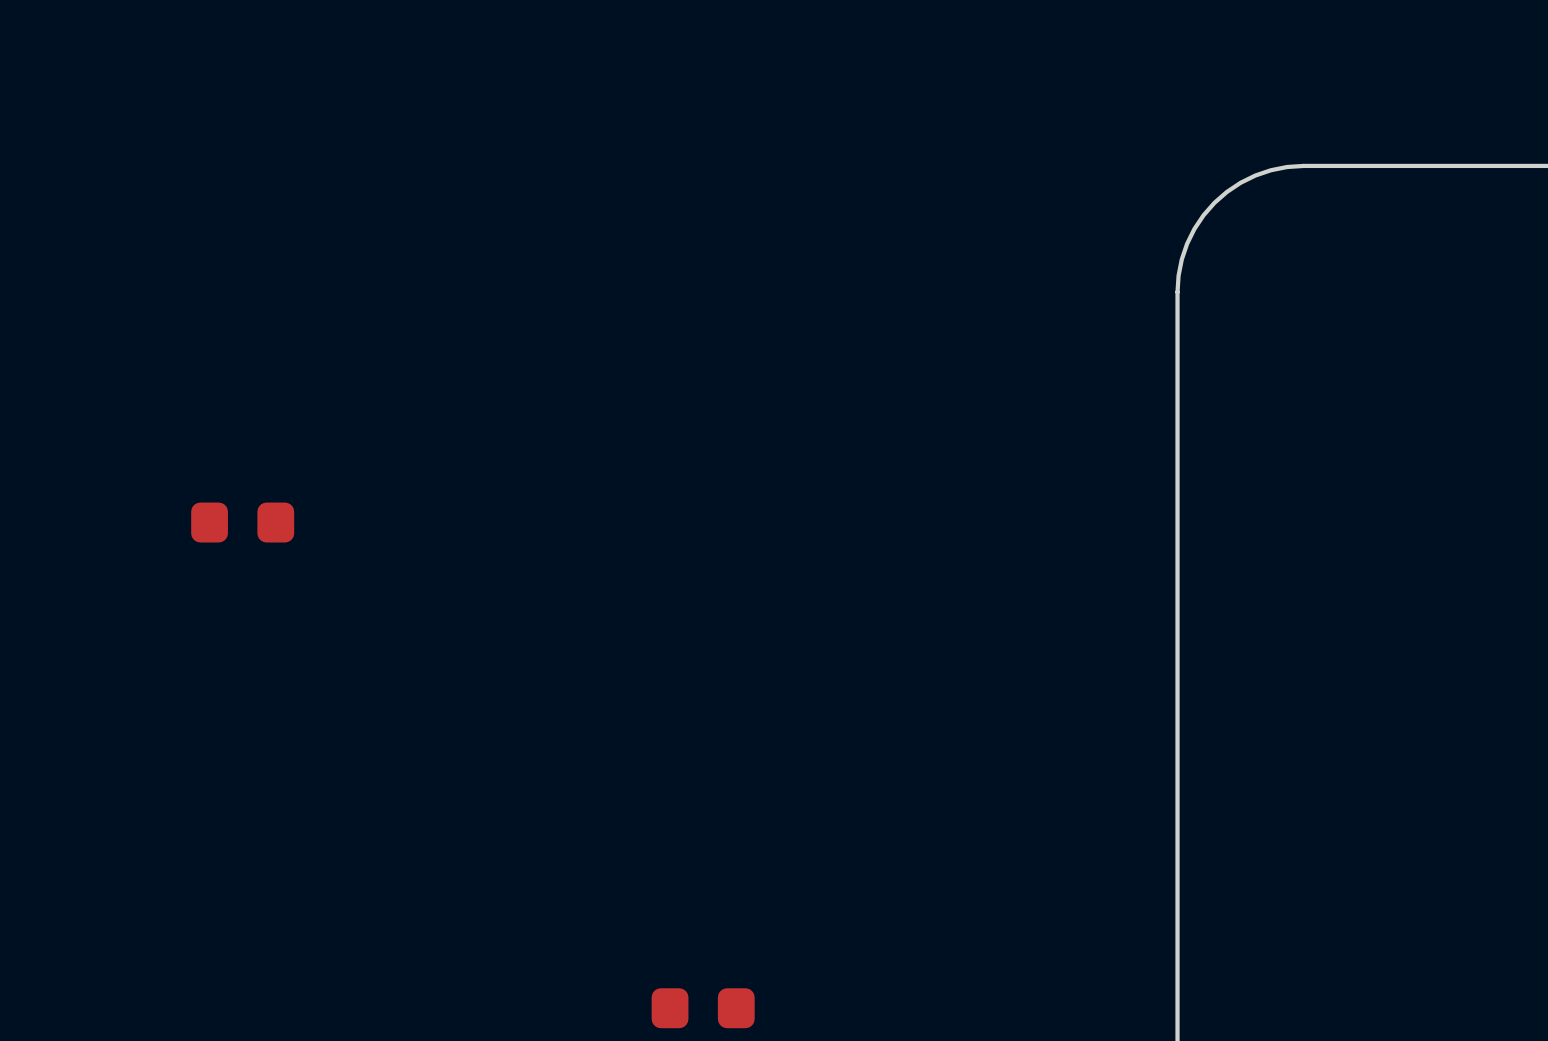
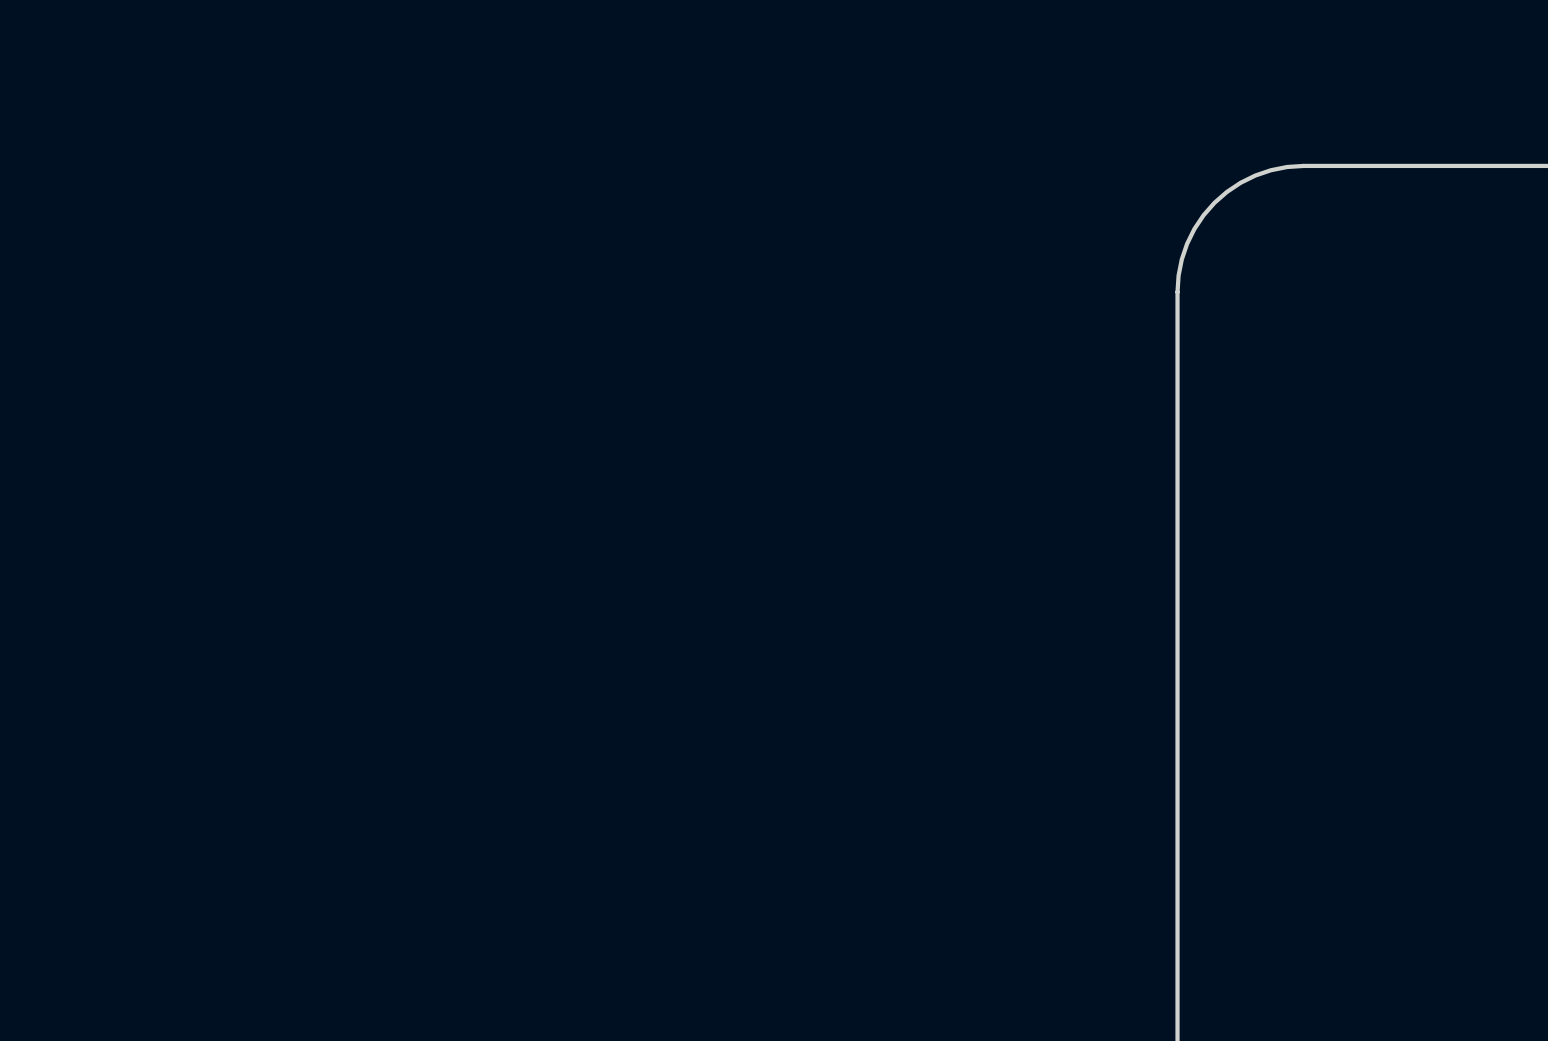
part: (242, 522) -> none
part: (703, 1008) -> none

